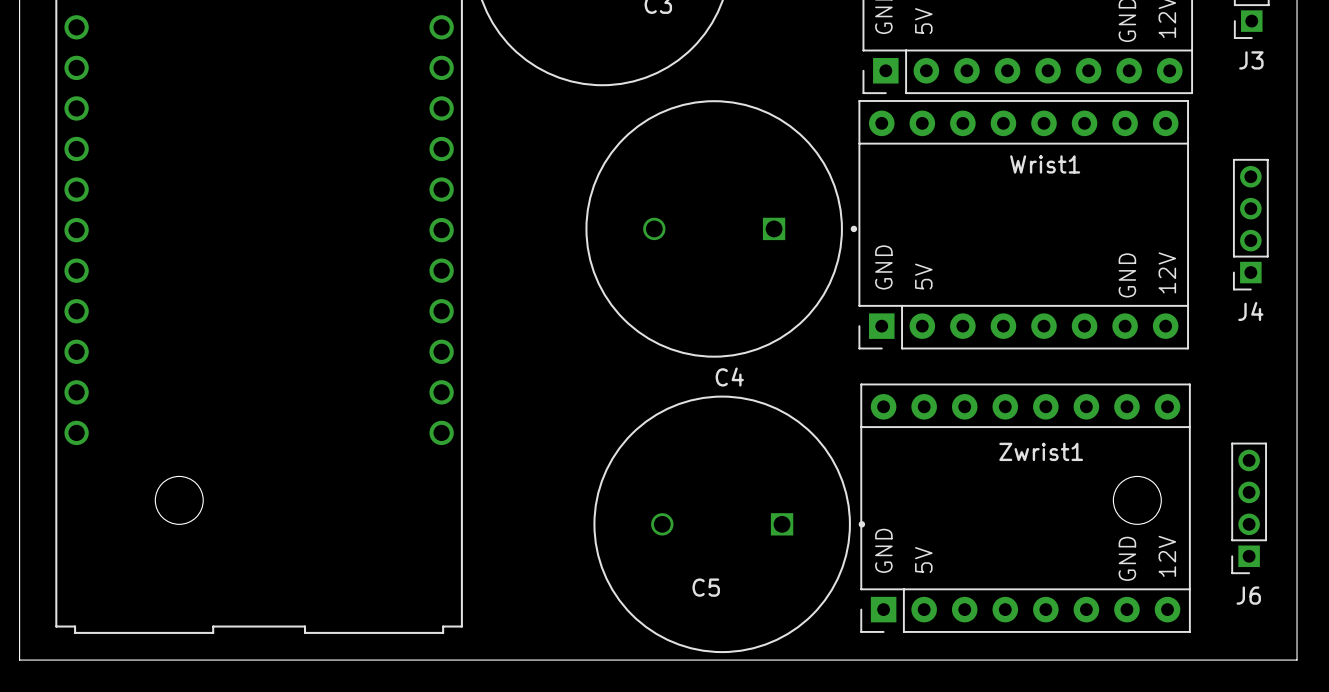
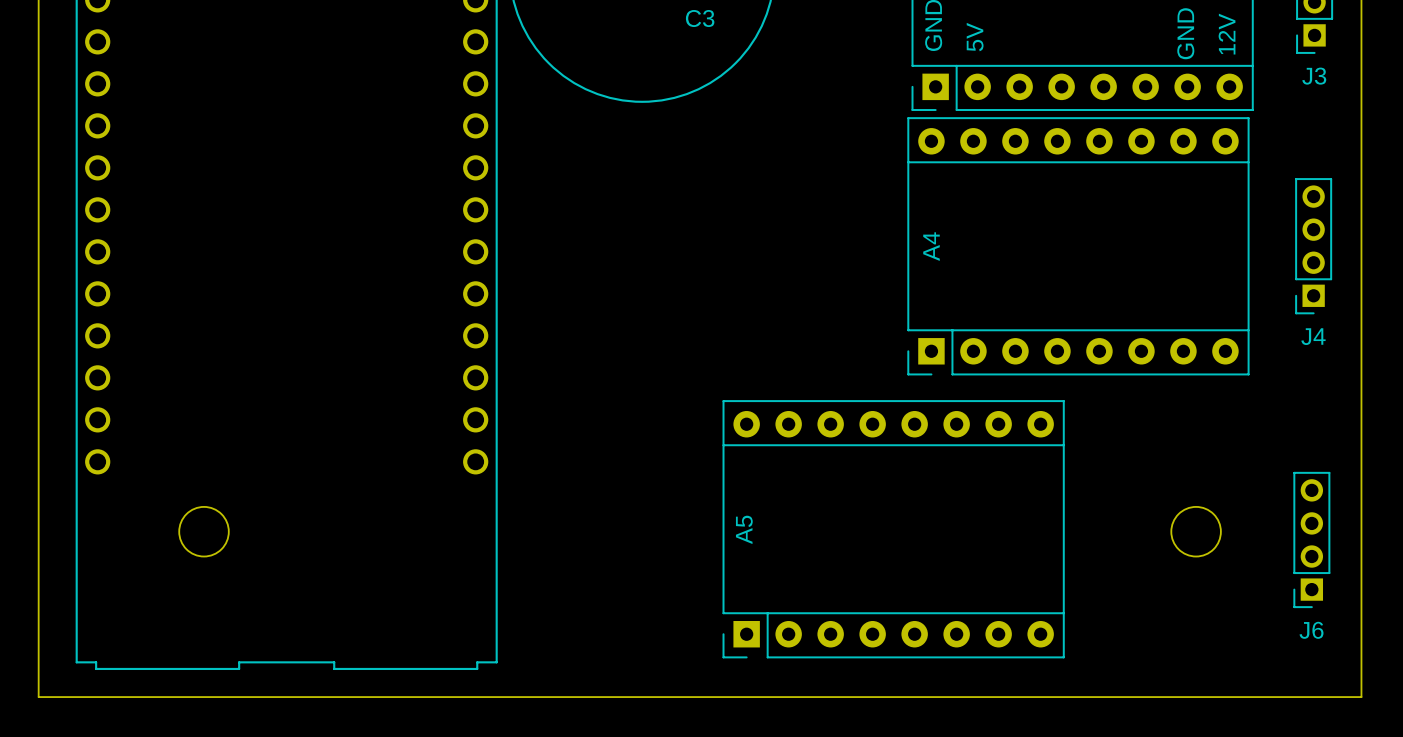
Wrist1 name: Wrist1 (1045, 164) -> A4 (931, 246)
C4: (721, 228) -> none
text: GND (883, 267) -> none
text: 12V (1167, 272) -> none
text: GND (1127, 275) -> none
text: 5V (923, 276) -> none
A5: none -> (893, 529)
Zwrist1: (1025, 508) -> none
C5: (729, 524) -> none
text: GND (883, 550) -> none
text: 12V (1167, 556) -> none
text: GND (1127, 558) -> none
text: 5V (923, 559) -> none

